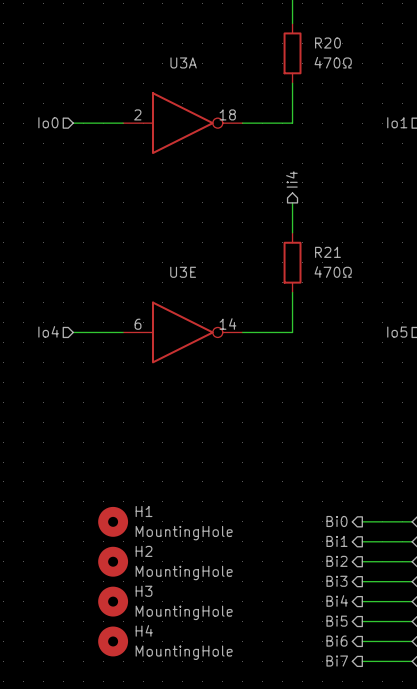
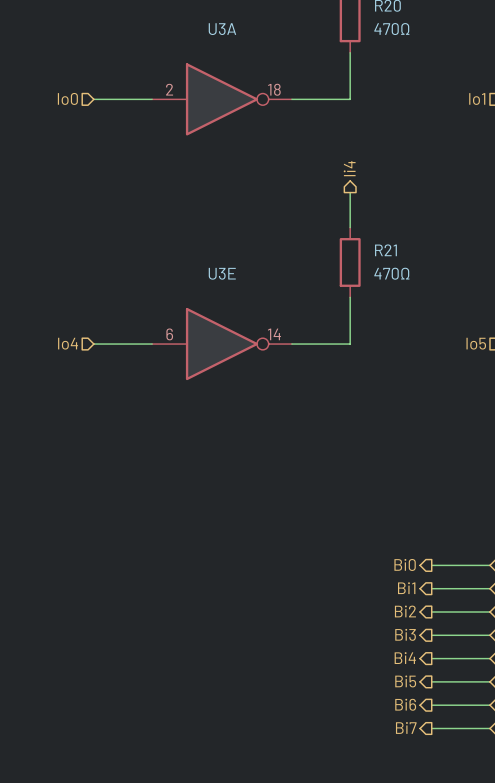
H1: MountingHole (113, 521) -> none
H2: MountingHole (113, 561) -> none
H3: MountingHole (113, 601) -> none
H4: MountingHole (113, 641) -> none

